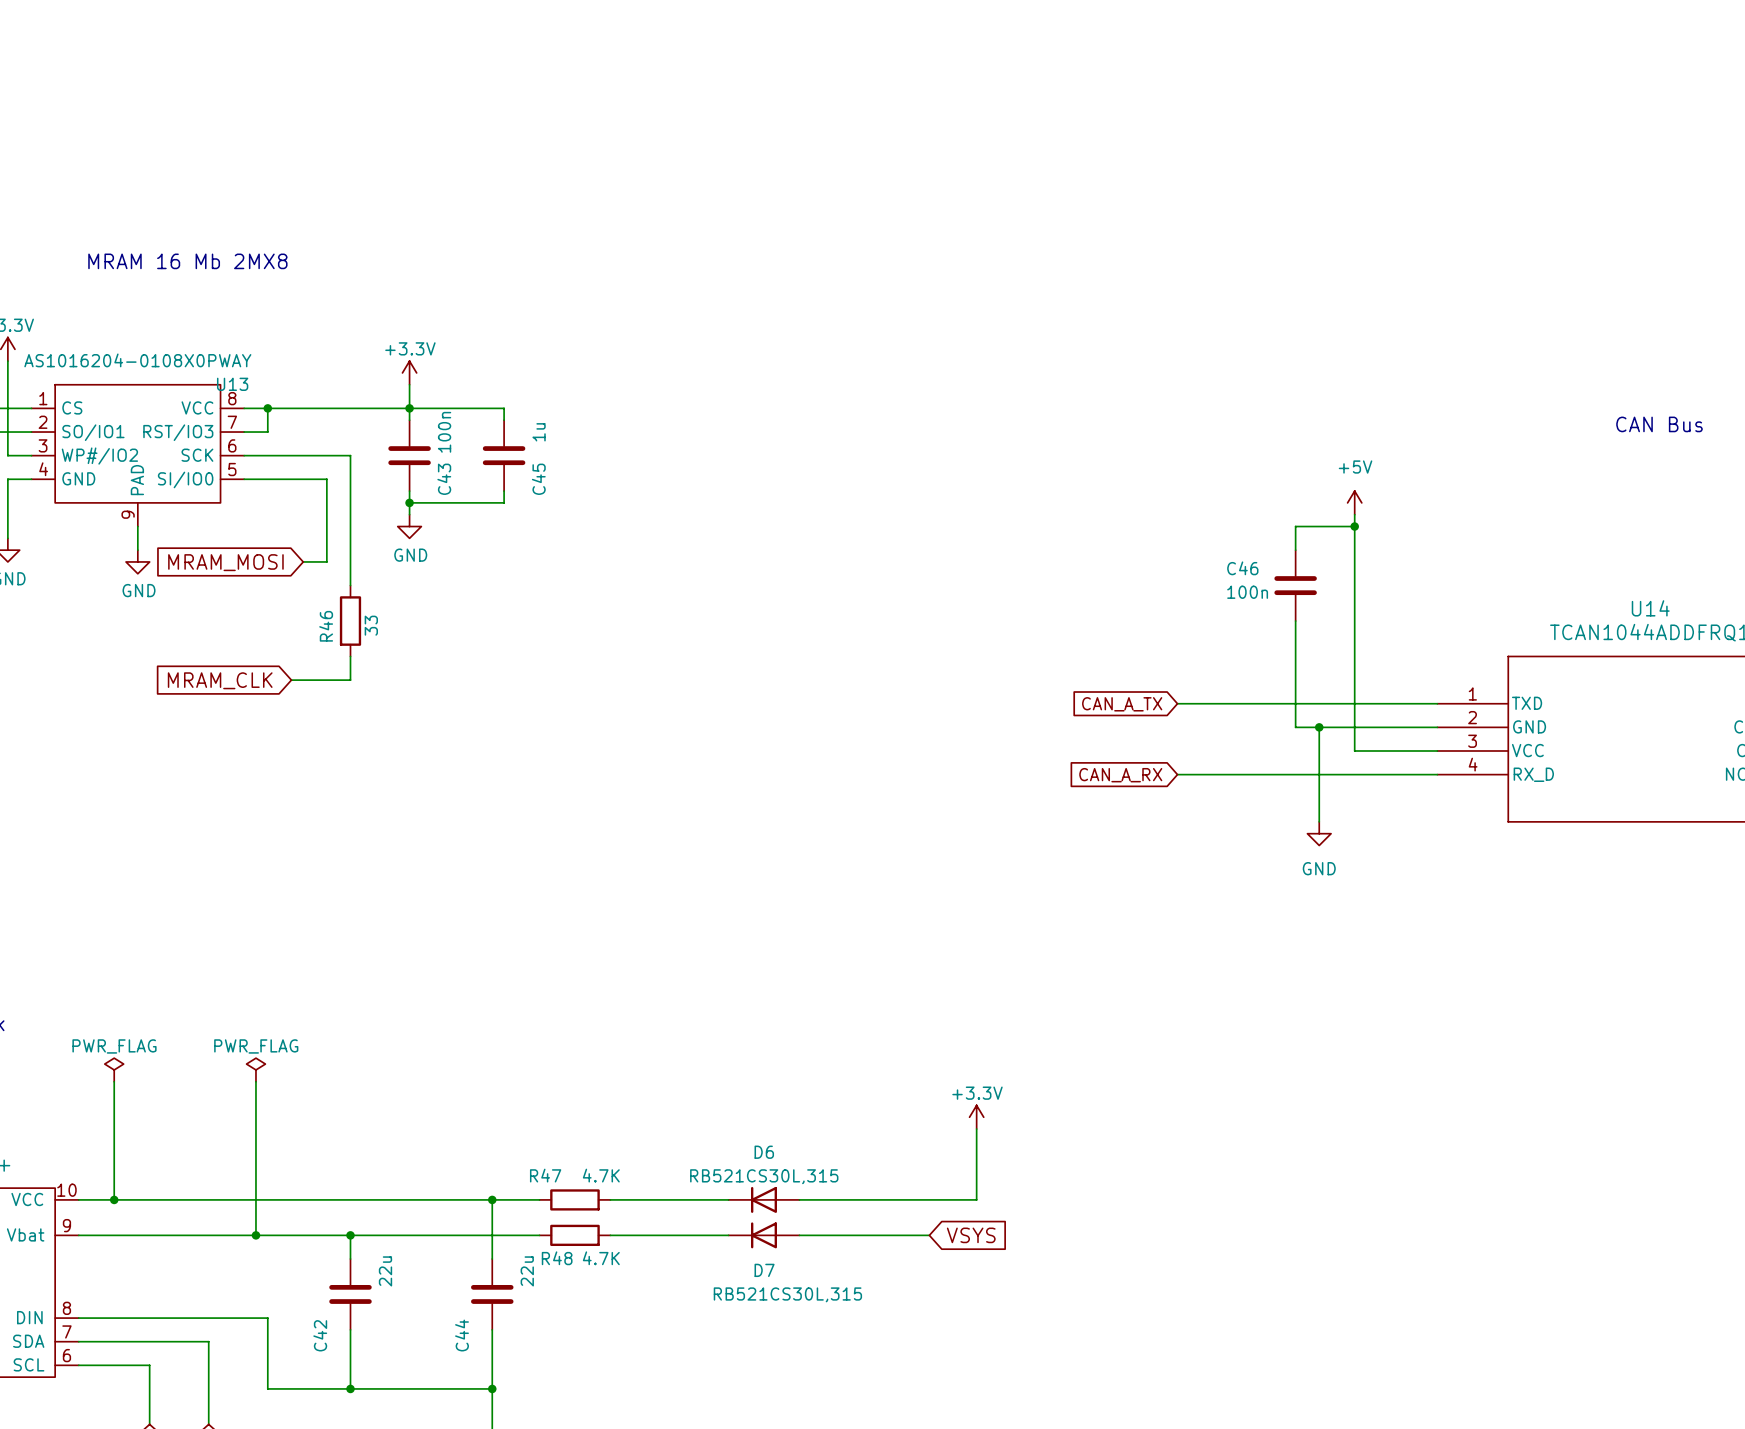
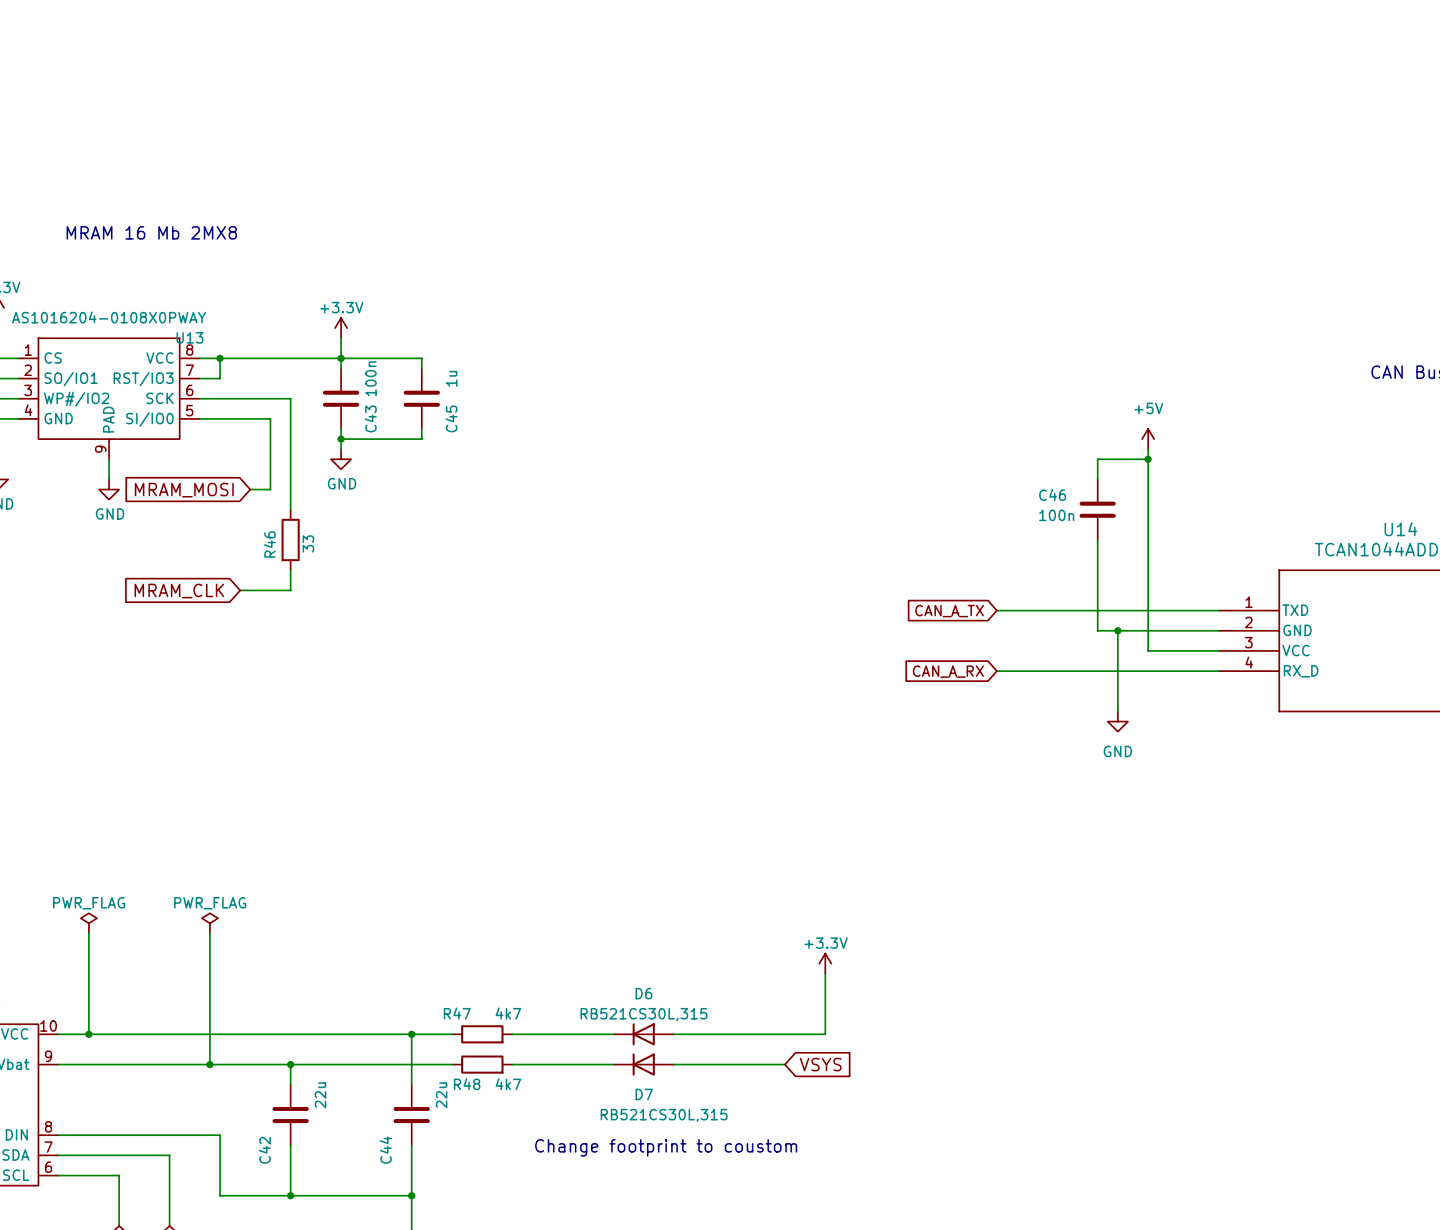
R47 value: 4.7K (601, 1175) -> 4k7 (508, 1013)
R48 value: 4.7K (601, 1258) -> 4k7 (508, 1084)
text: none -> Change footprint to coustom (666, 1147)

